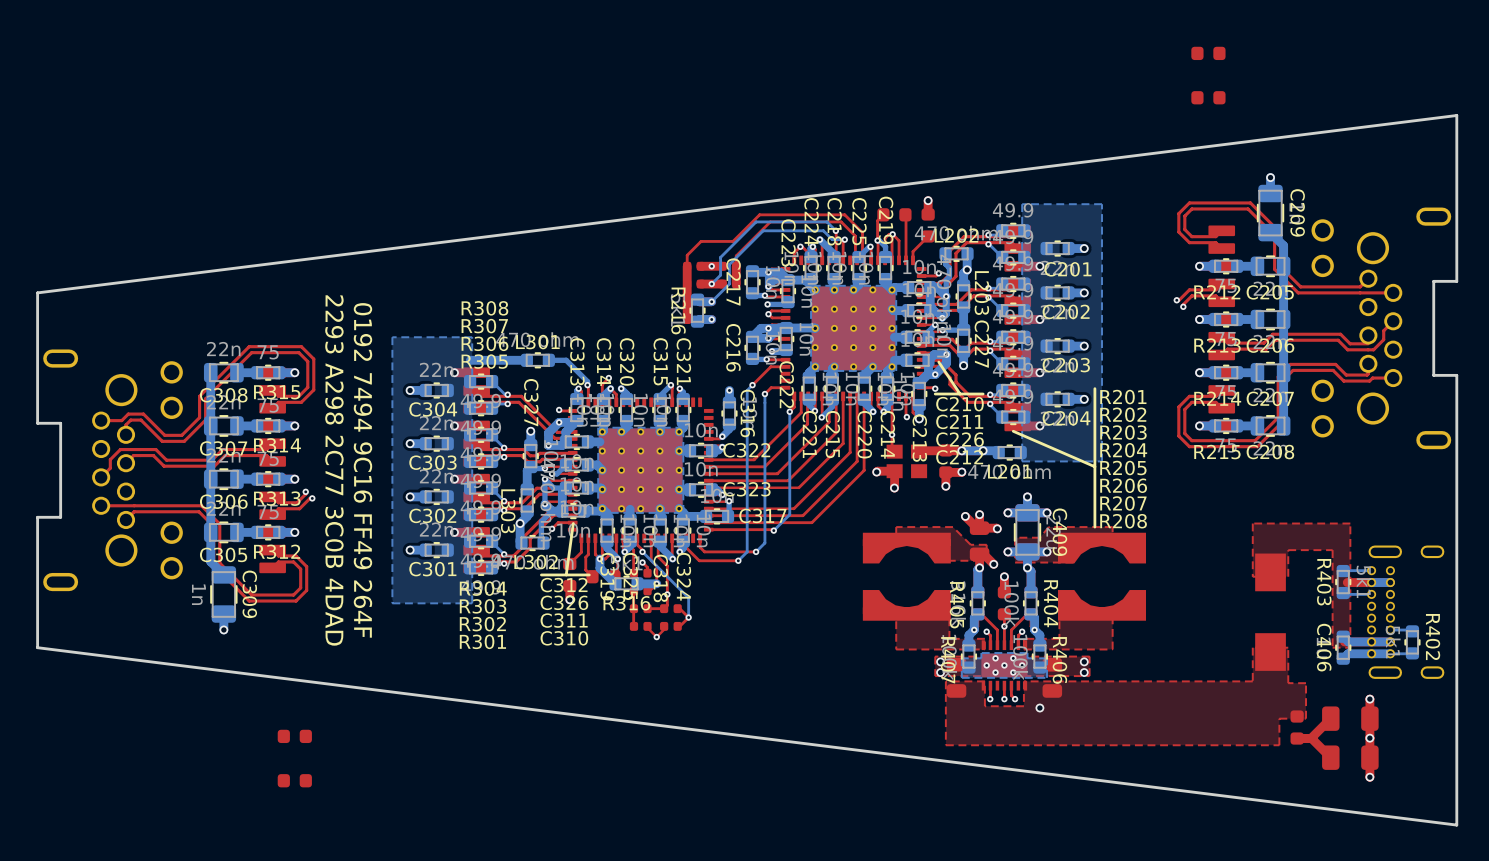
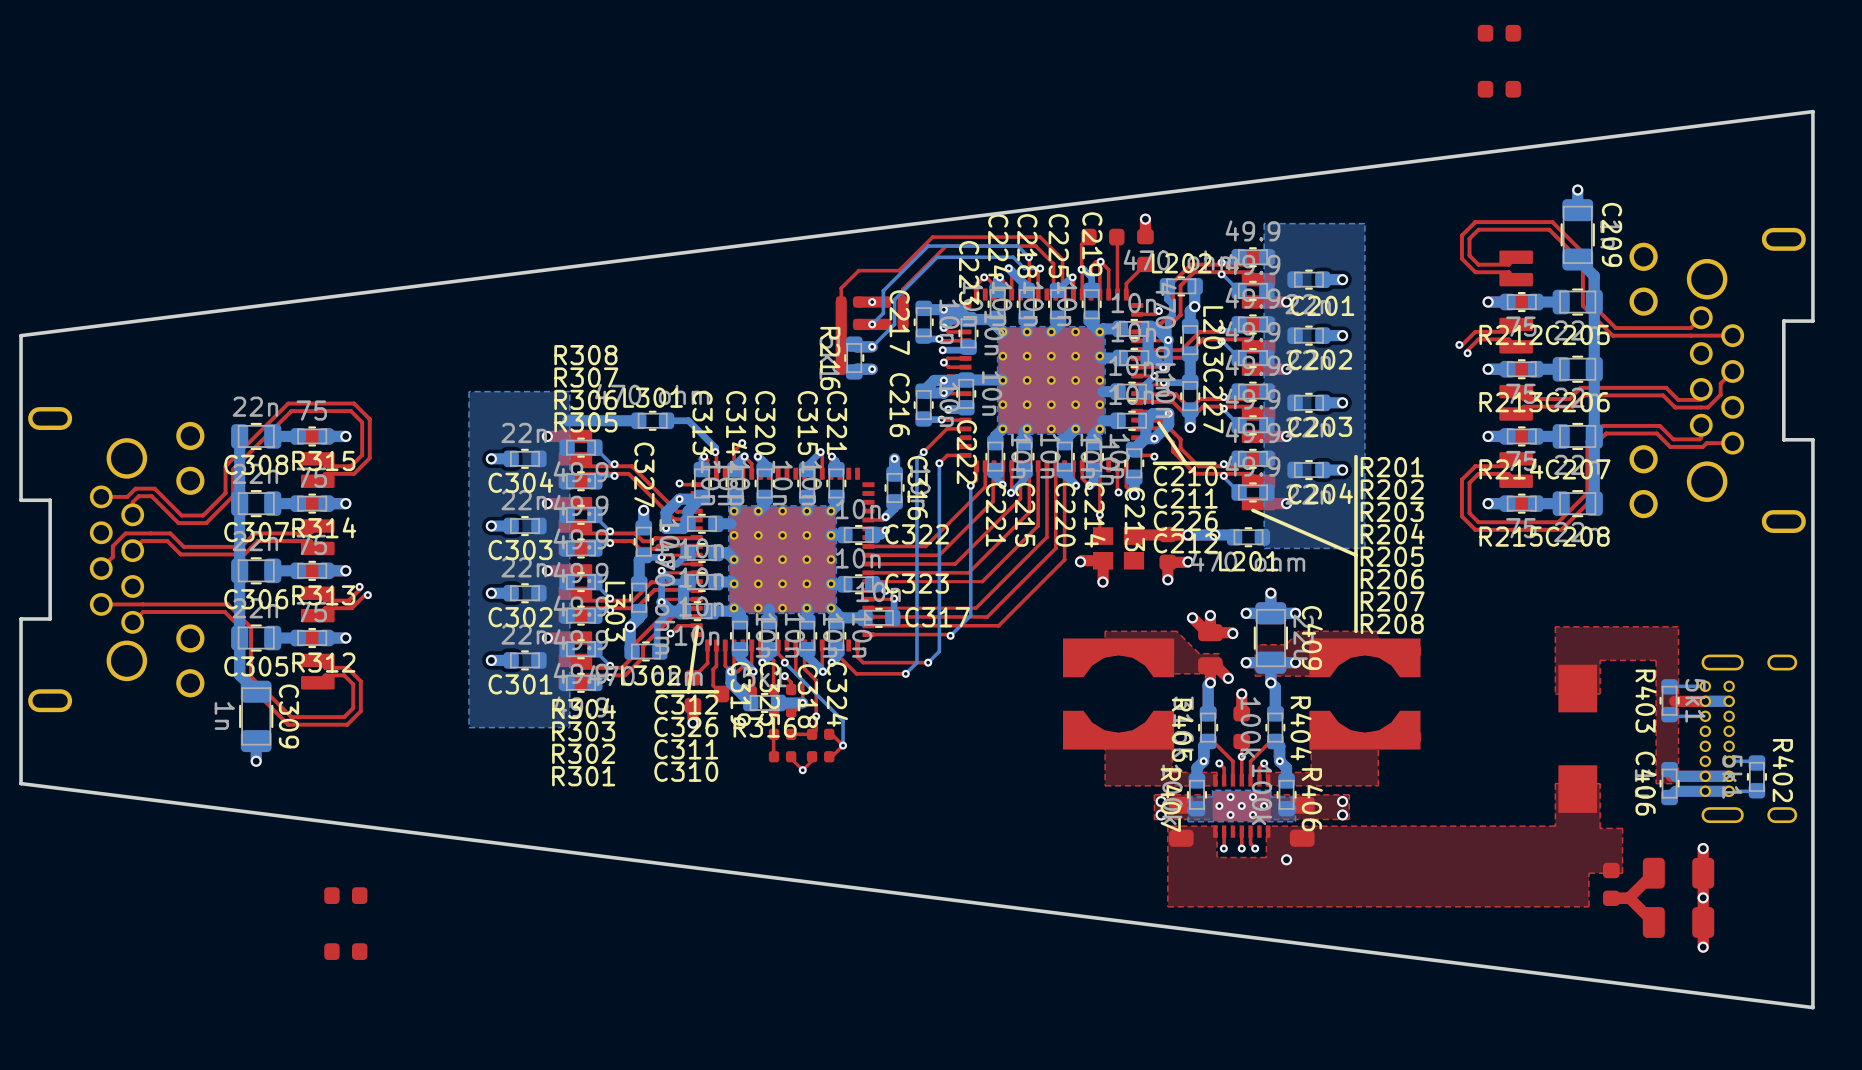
text: 2293 A298 2C77 3C0B 4DAD (334, 470) -> none
text: 0192 7494 9C16 FF49 264F (362, 470) -> none

